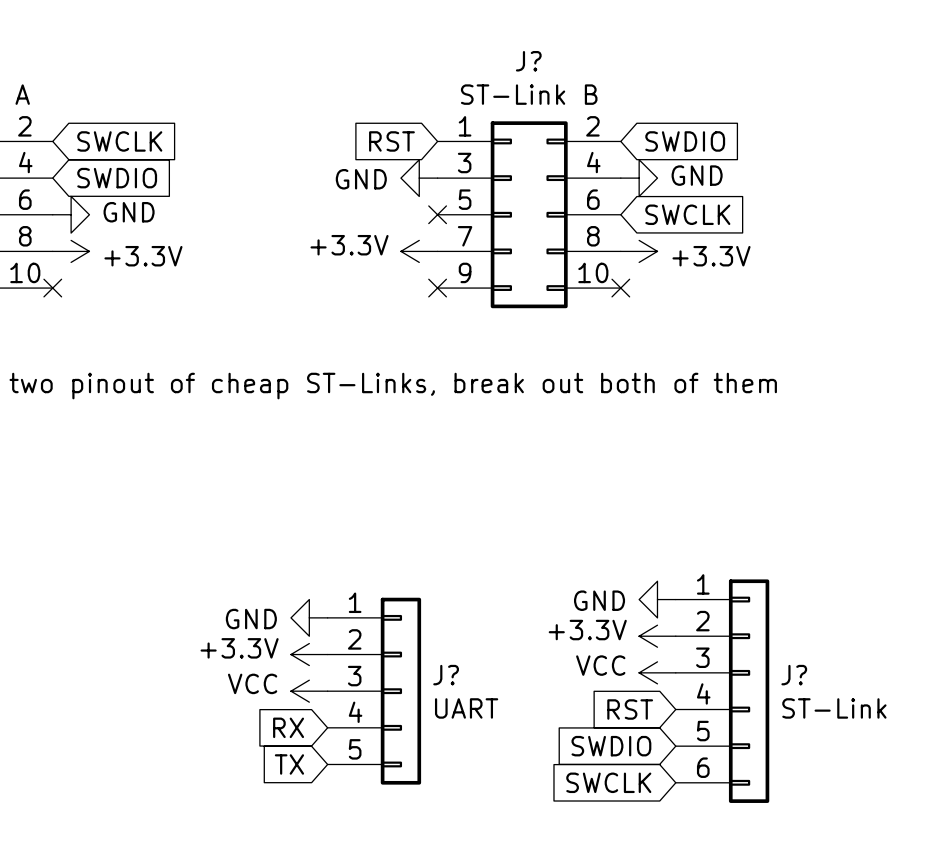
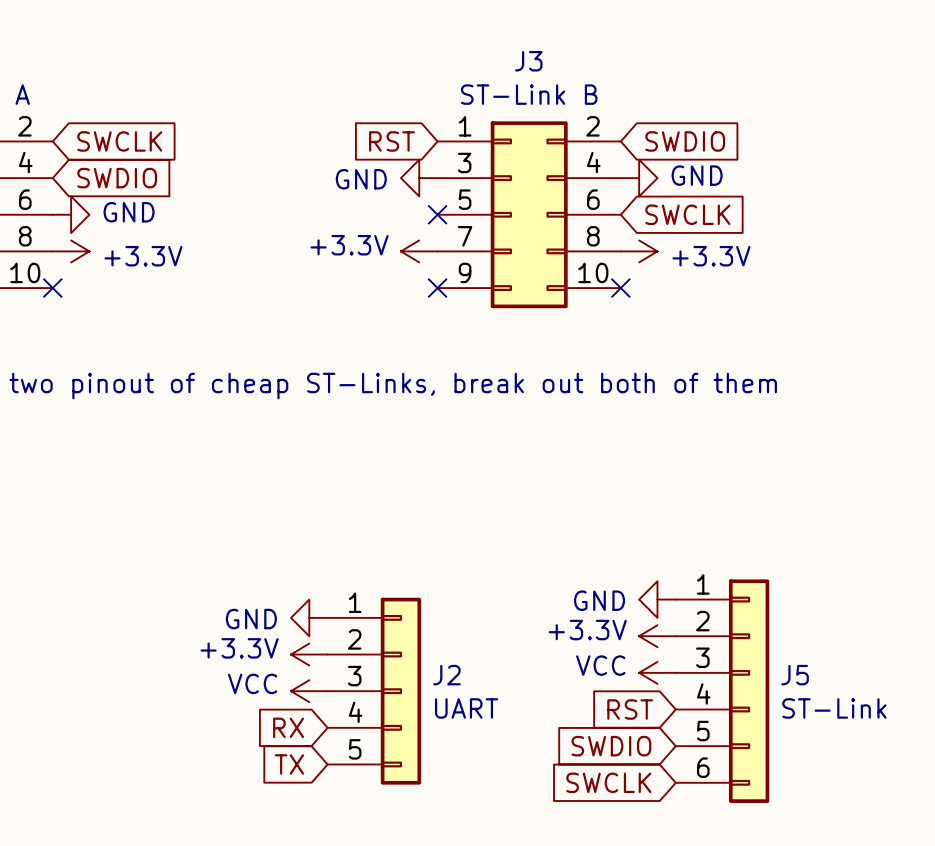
J? name: J? (528, 61) -> J3 (528, 61)
J? name: J? (446, 675) -> J2 (446, 675)
J? name: J? (794, 675) -> J5 (795, 675)

